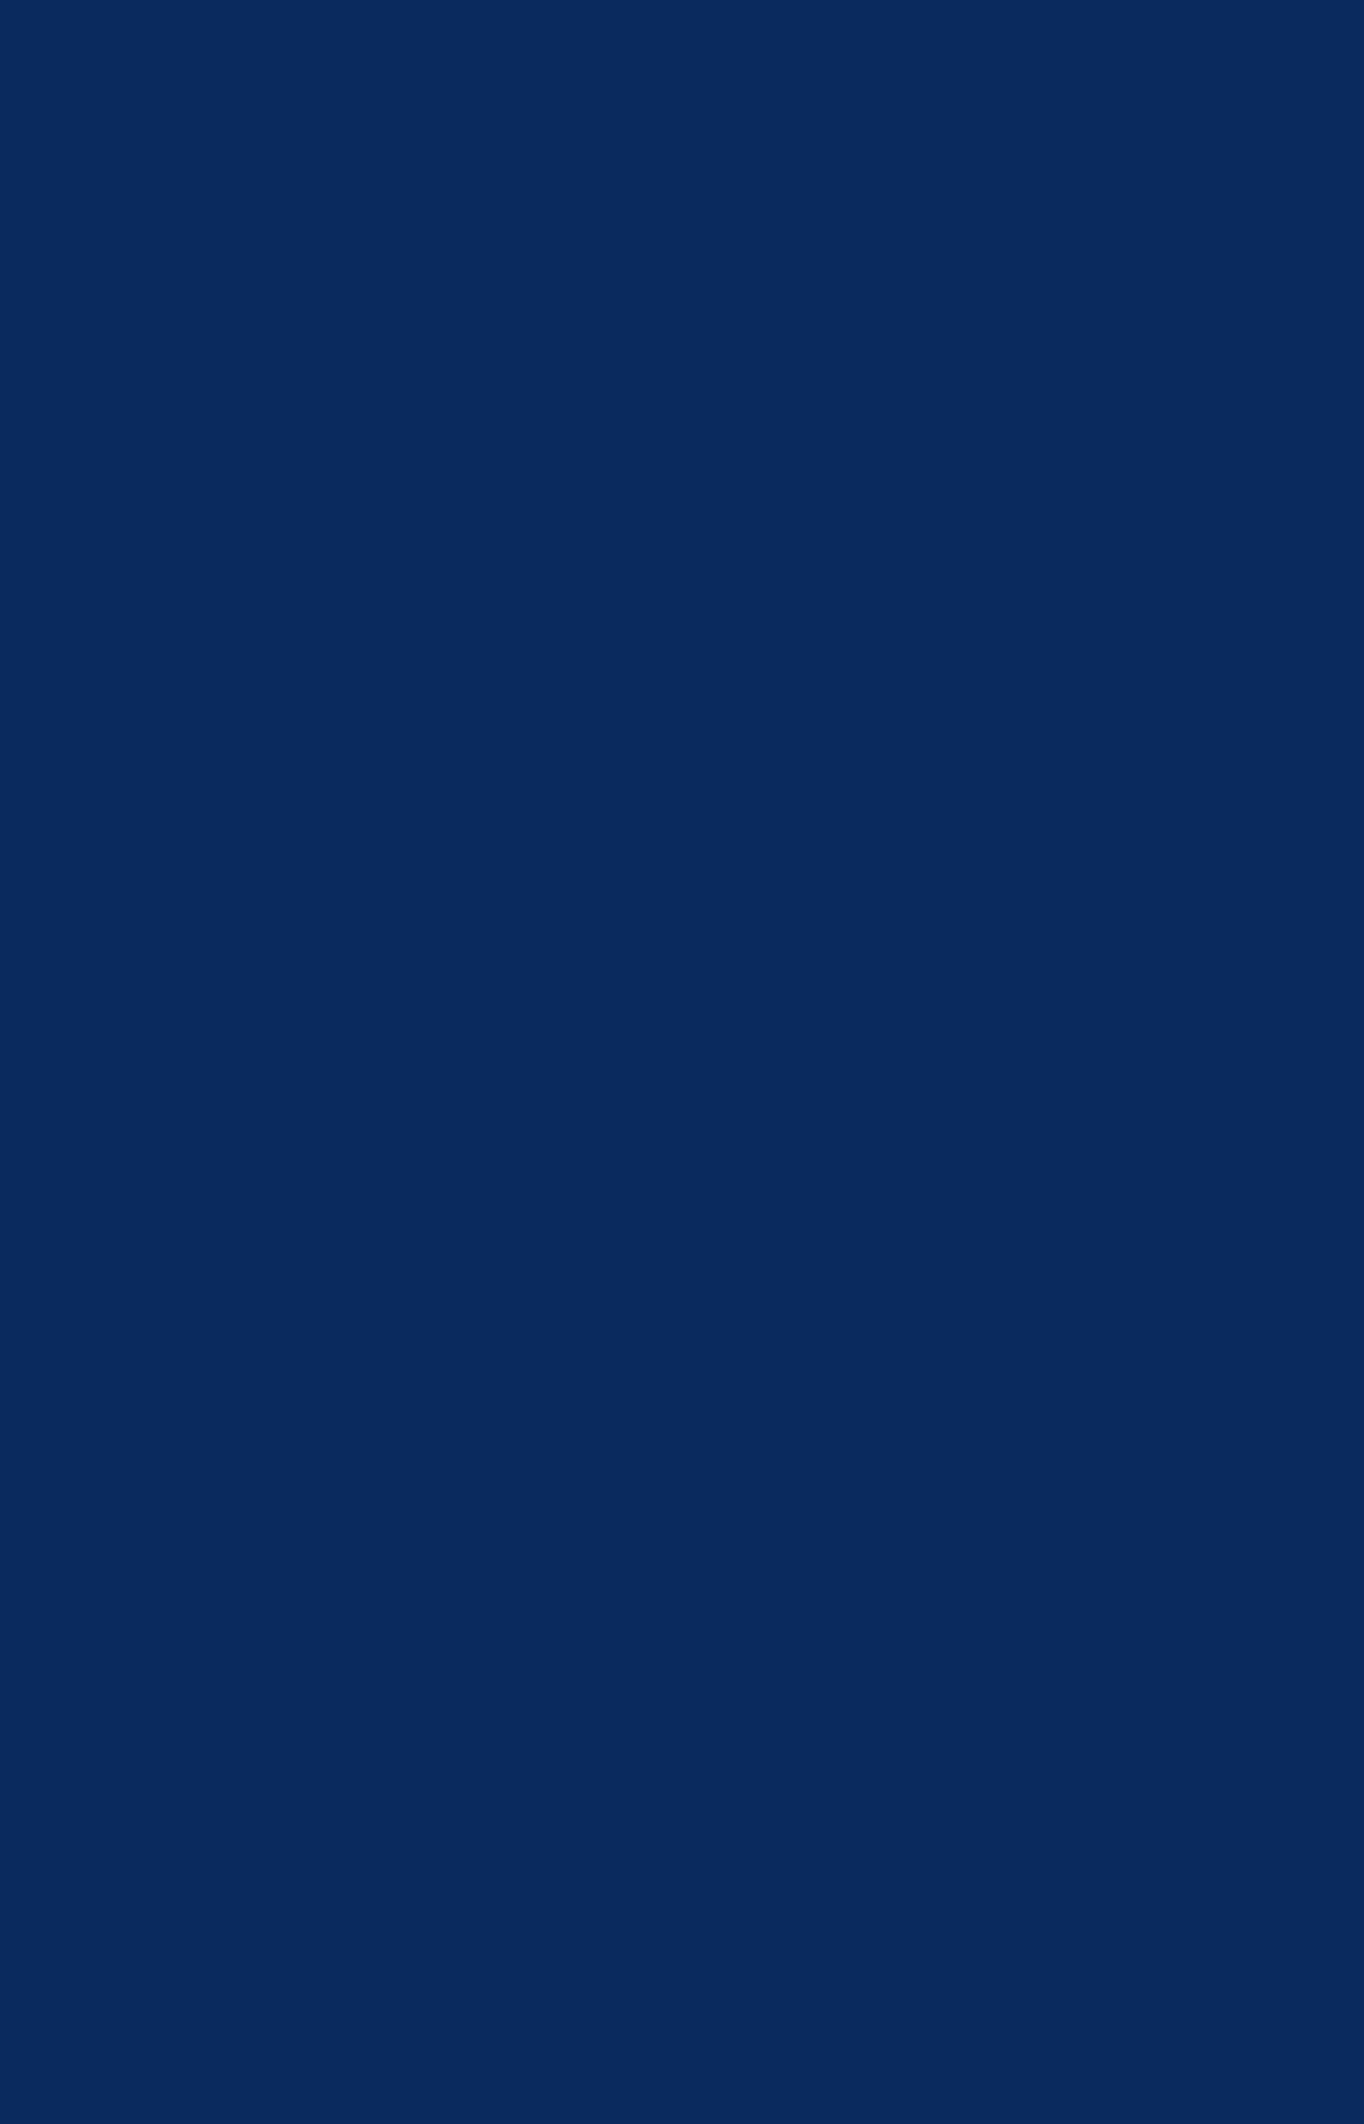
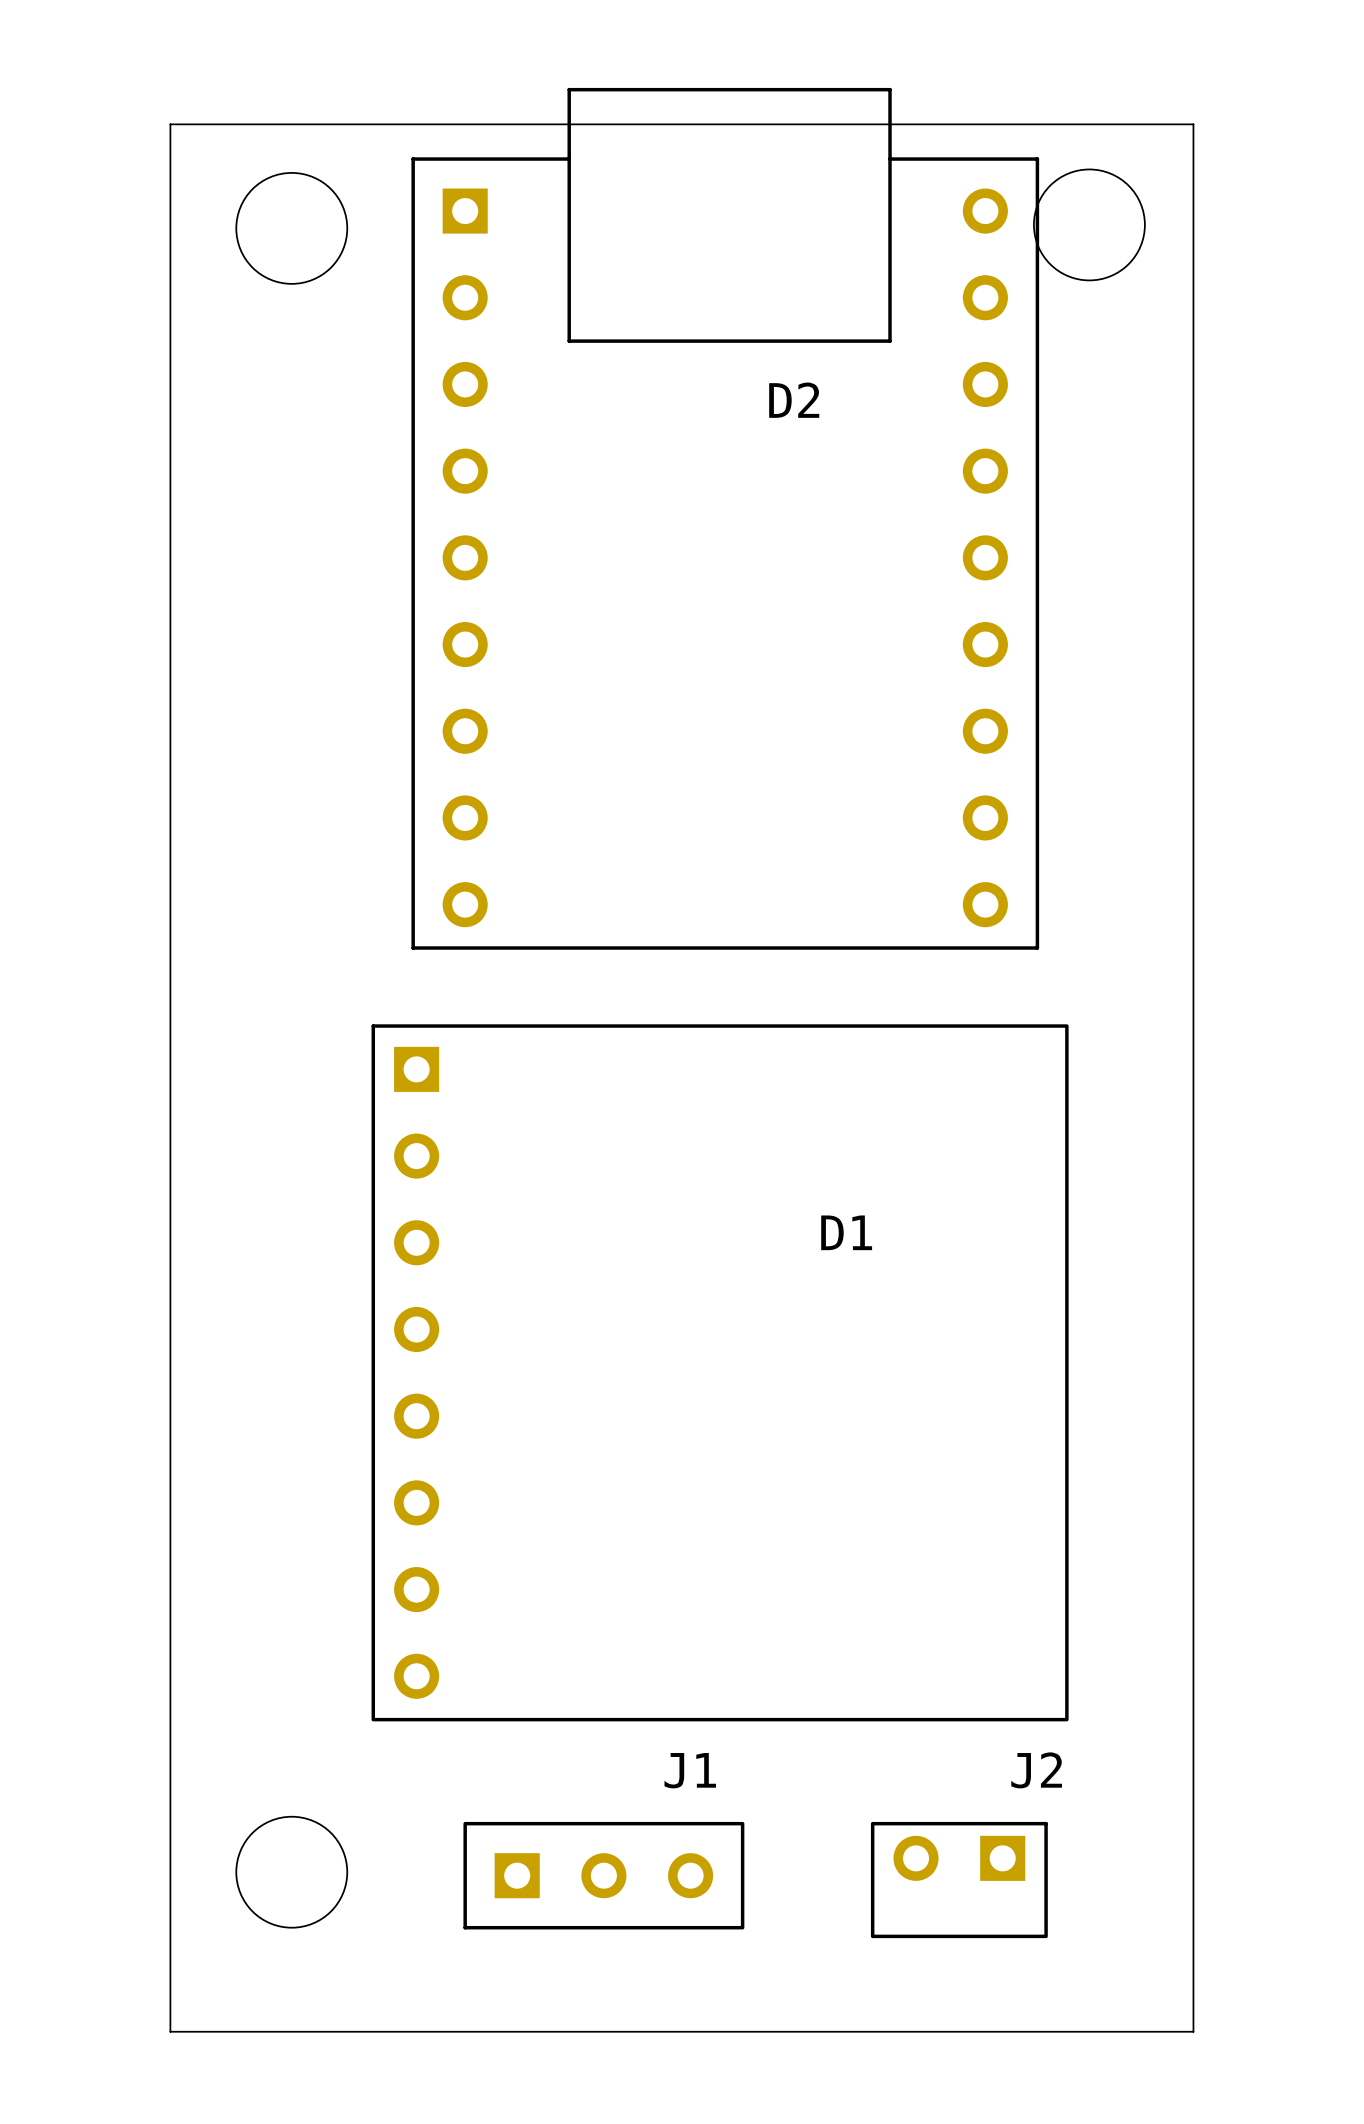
board edge: none -> (170, 124) (1193, 124) (1193, 2031) (170, 2031) (170, 124)
round board edge: none -> [1033, 168, 1146, 282]
round board edge: none -> [235, 172, 349, 285]
D2: none -> (725, 518)
D1: none -> (720, 1372)
round board edge: none -> [235, 1815, 349, 1929]
J1: none -> (603, 1875)
J2: none -> (959, 1880)

